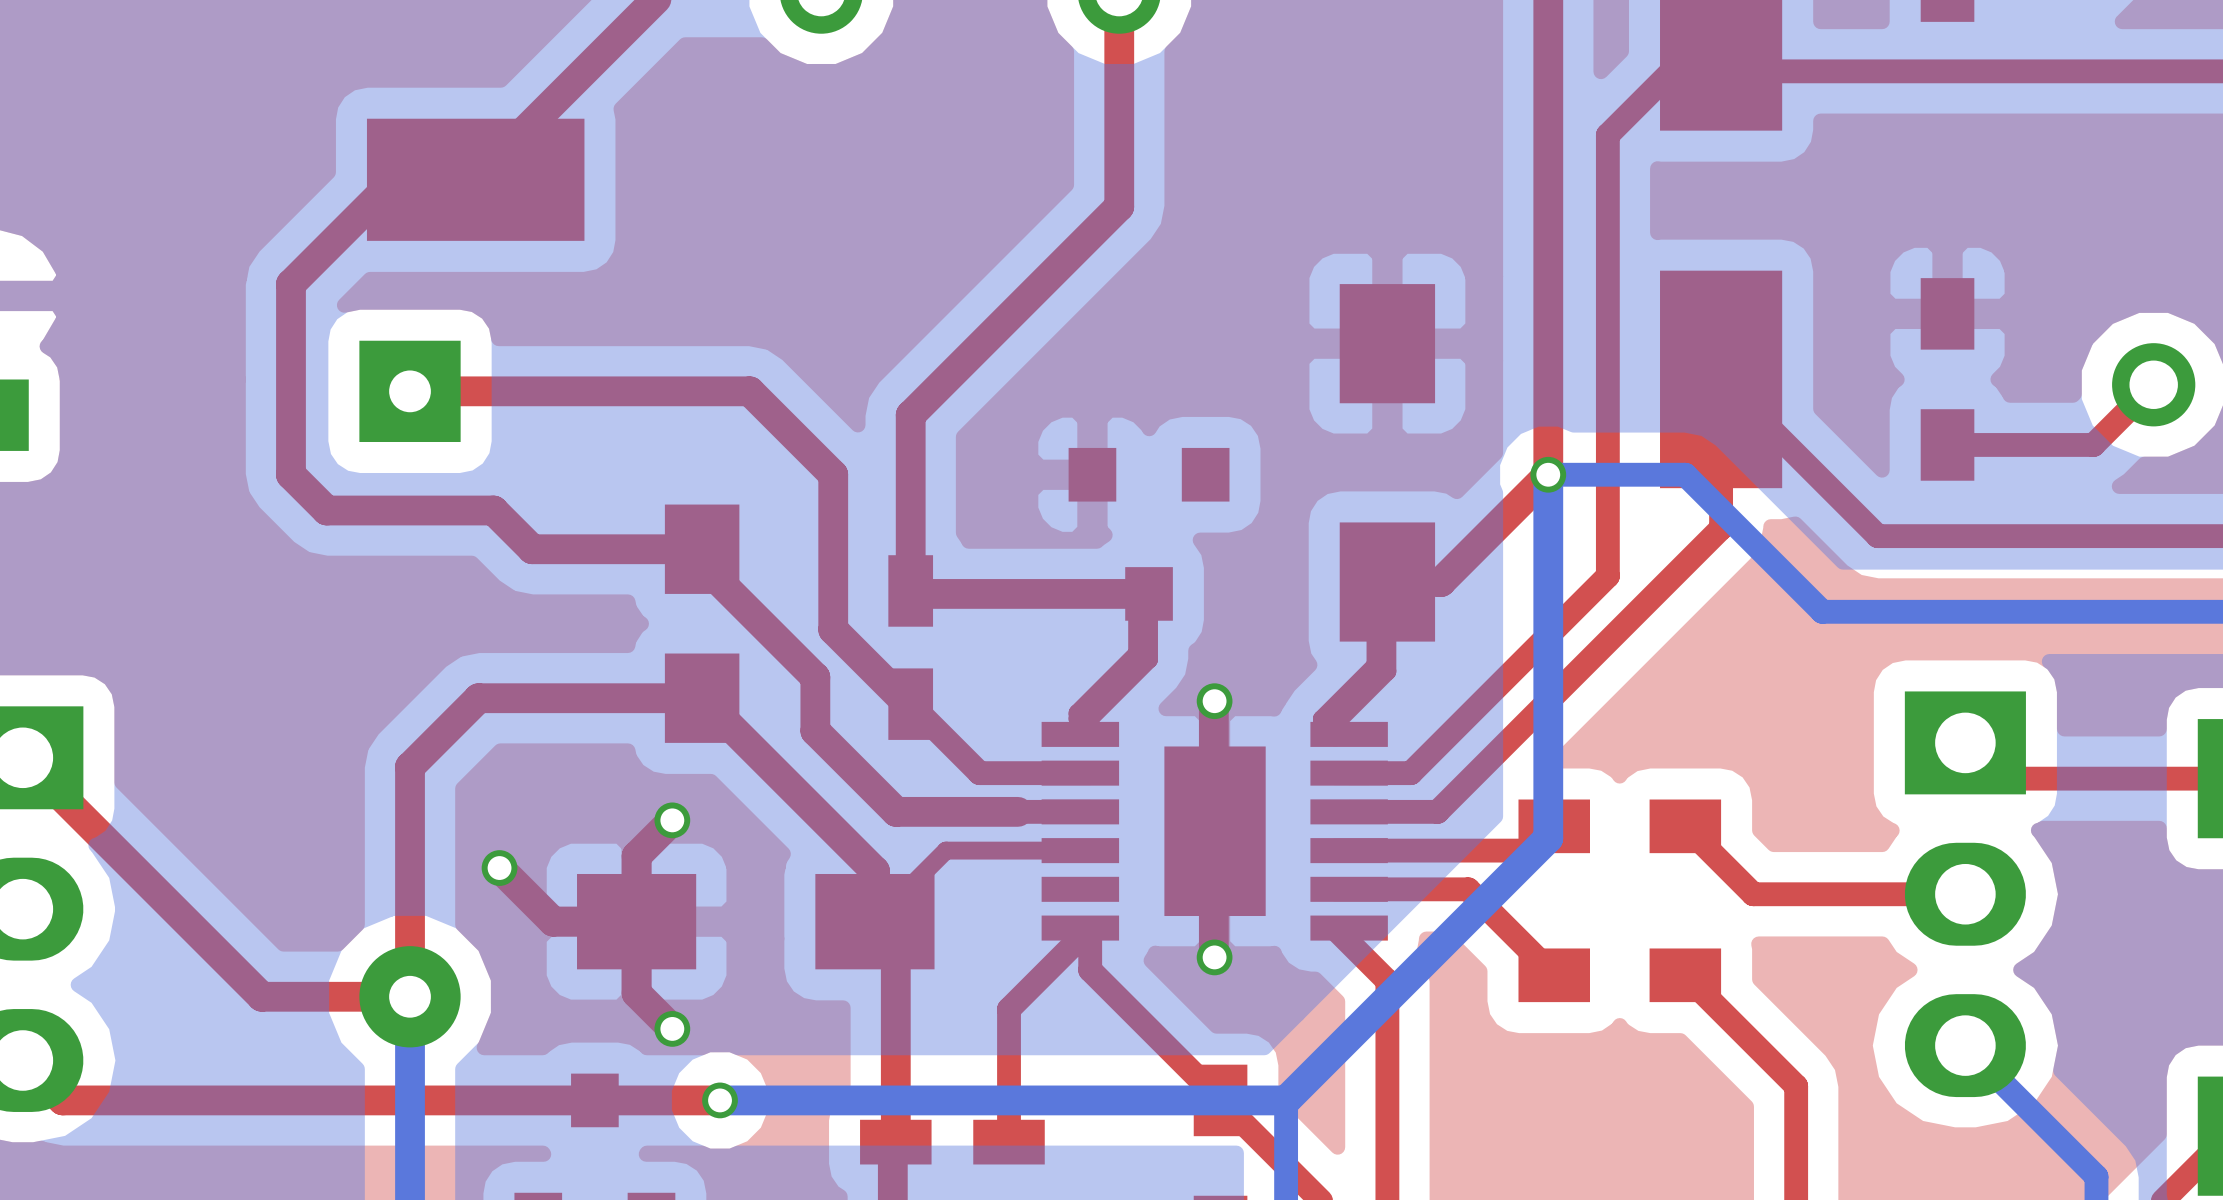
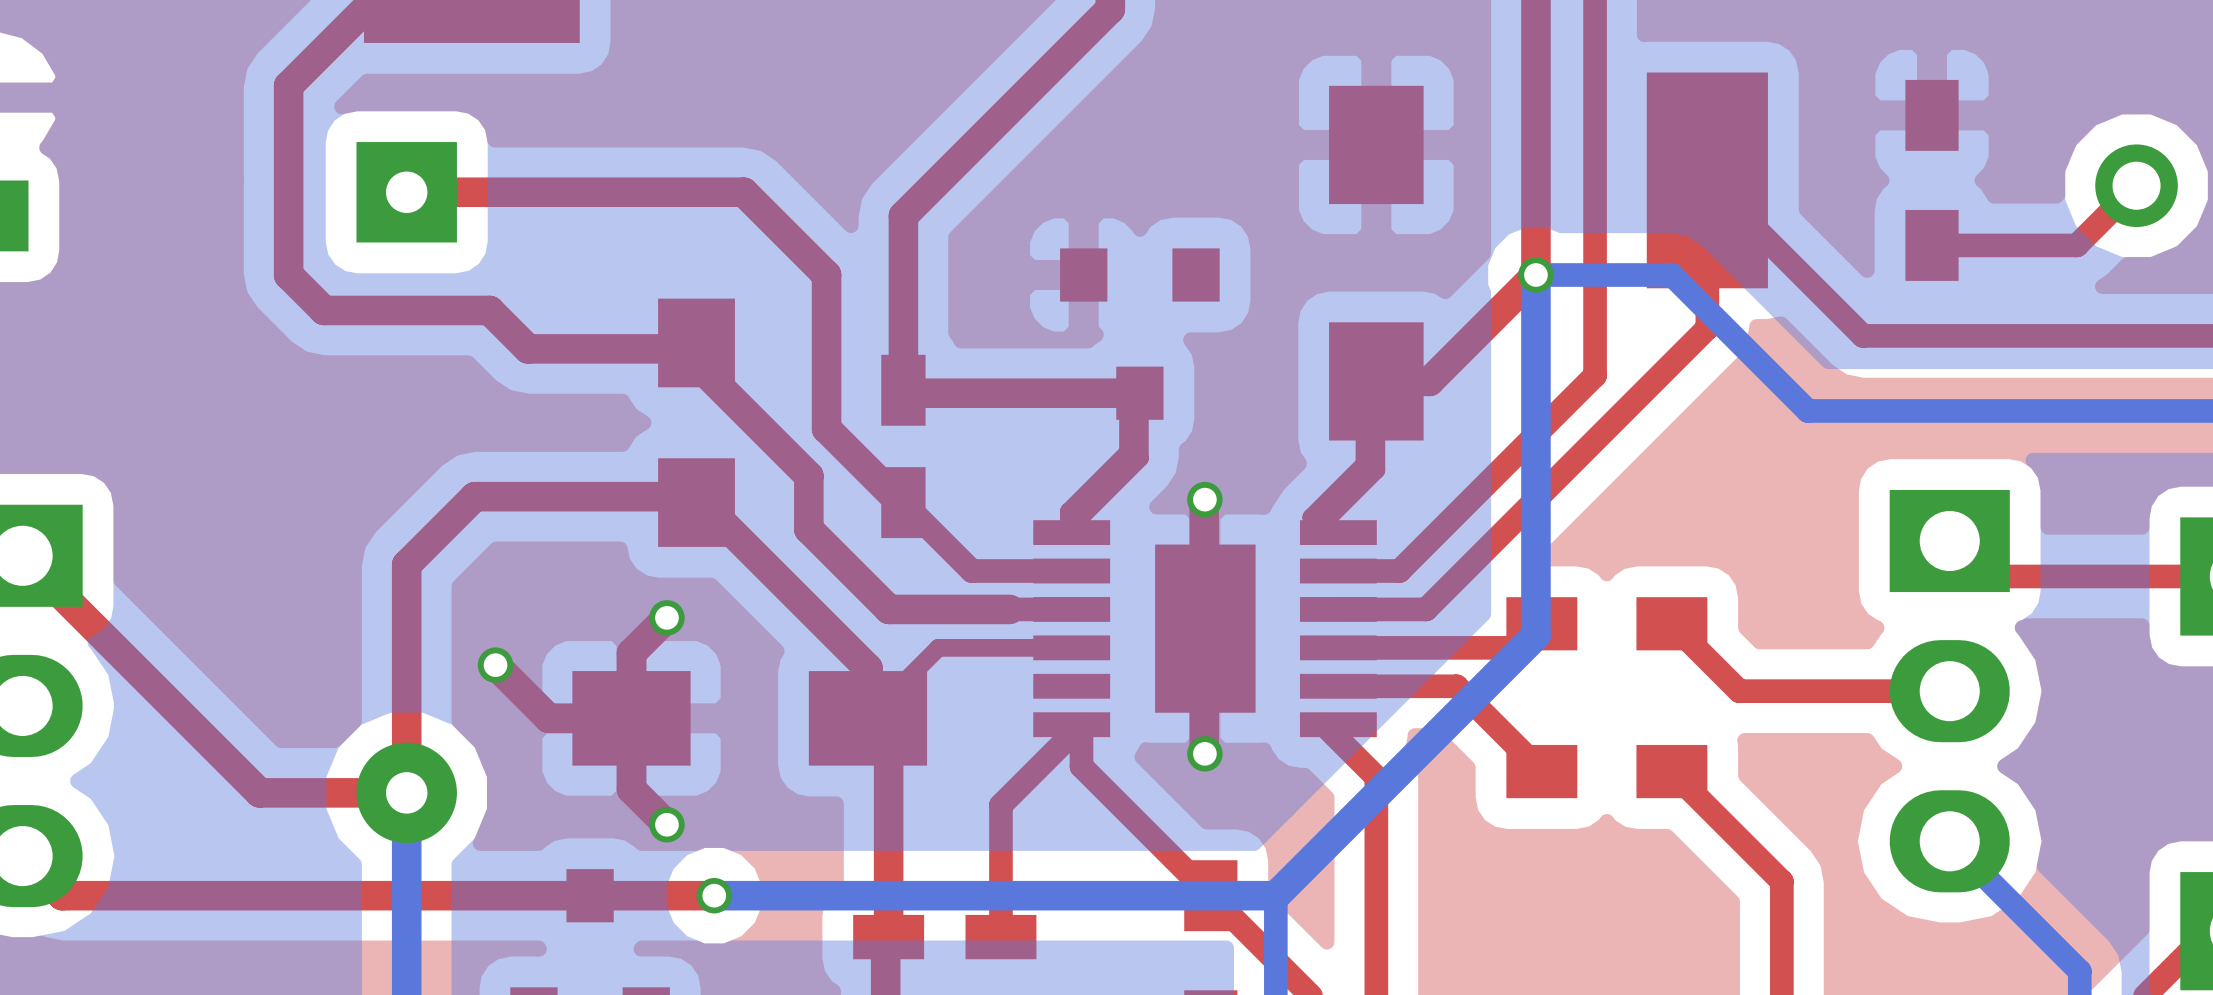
part footprint: [664, 504, 740, 743] -> [658, 298, 735, 547]

